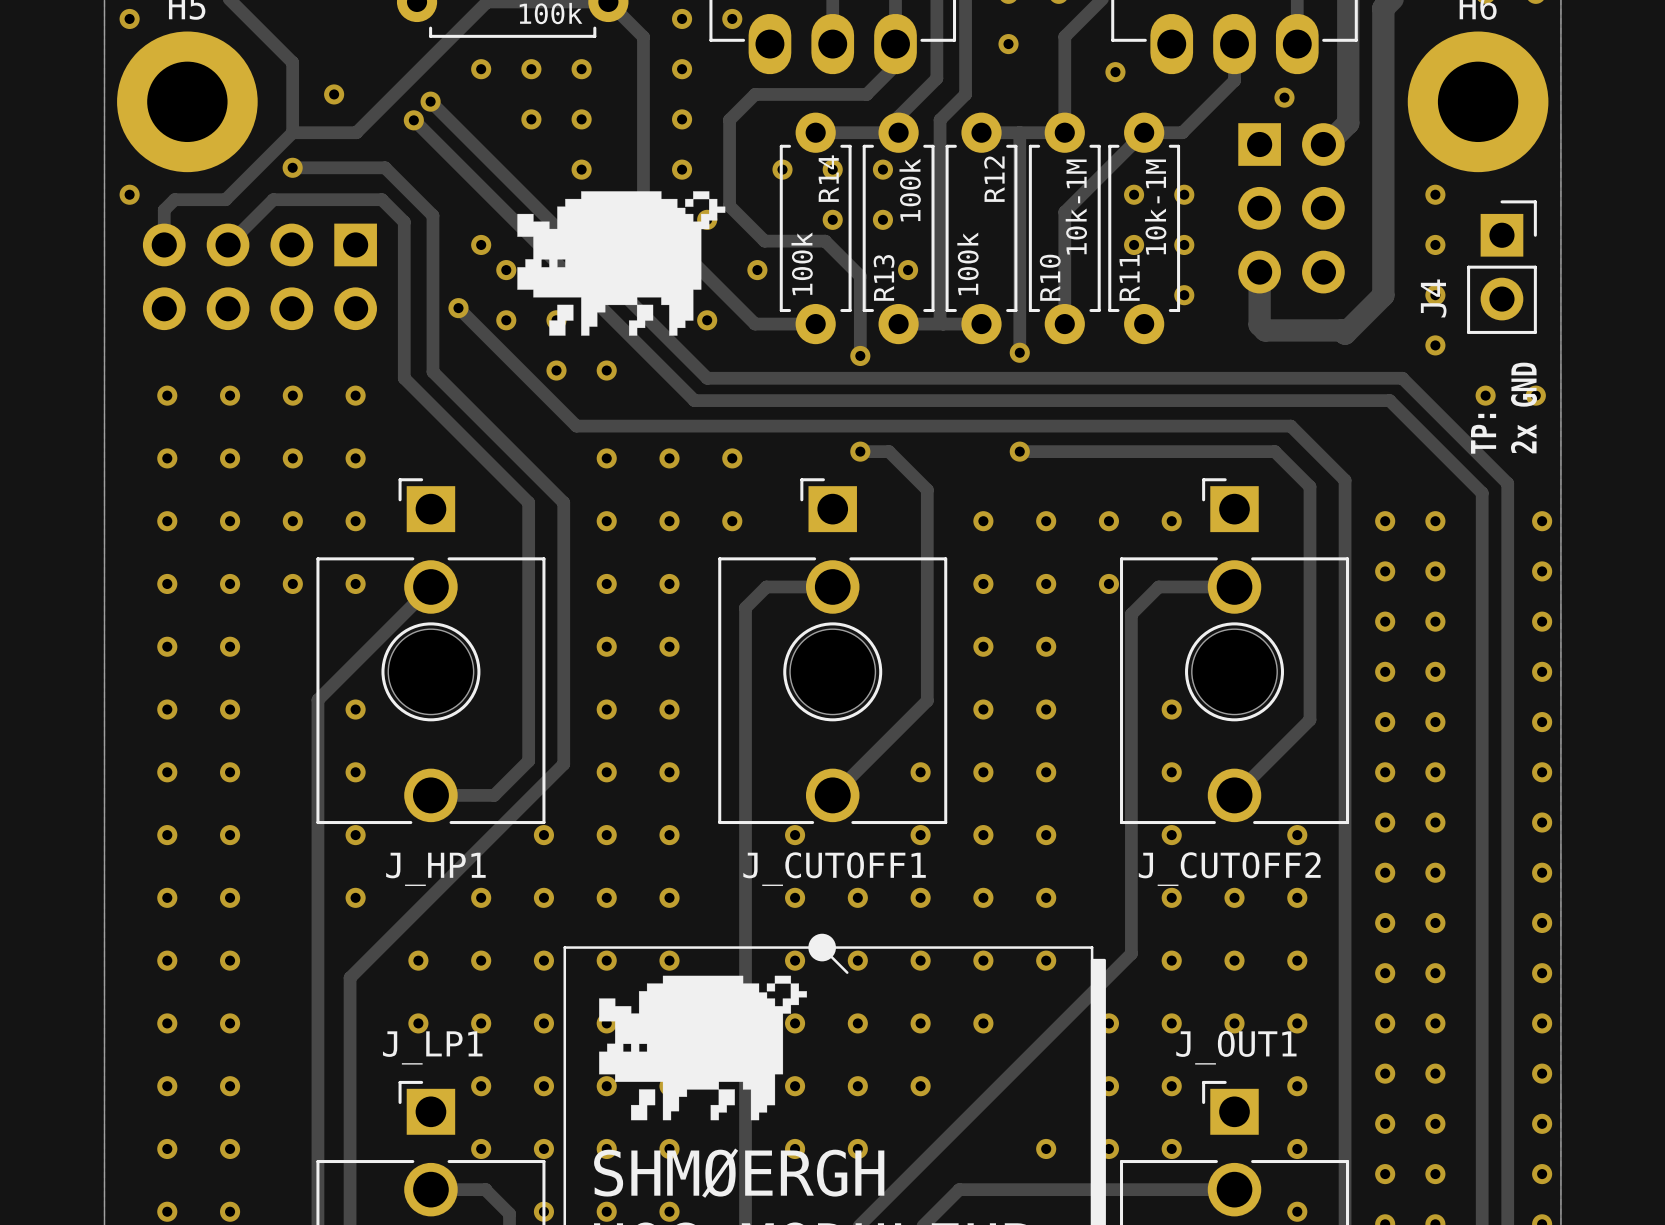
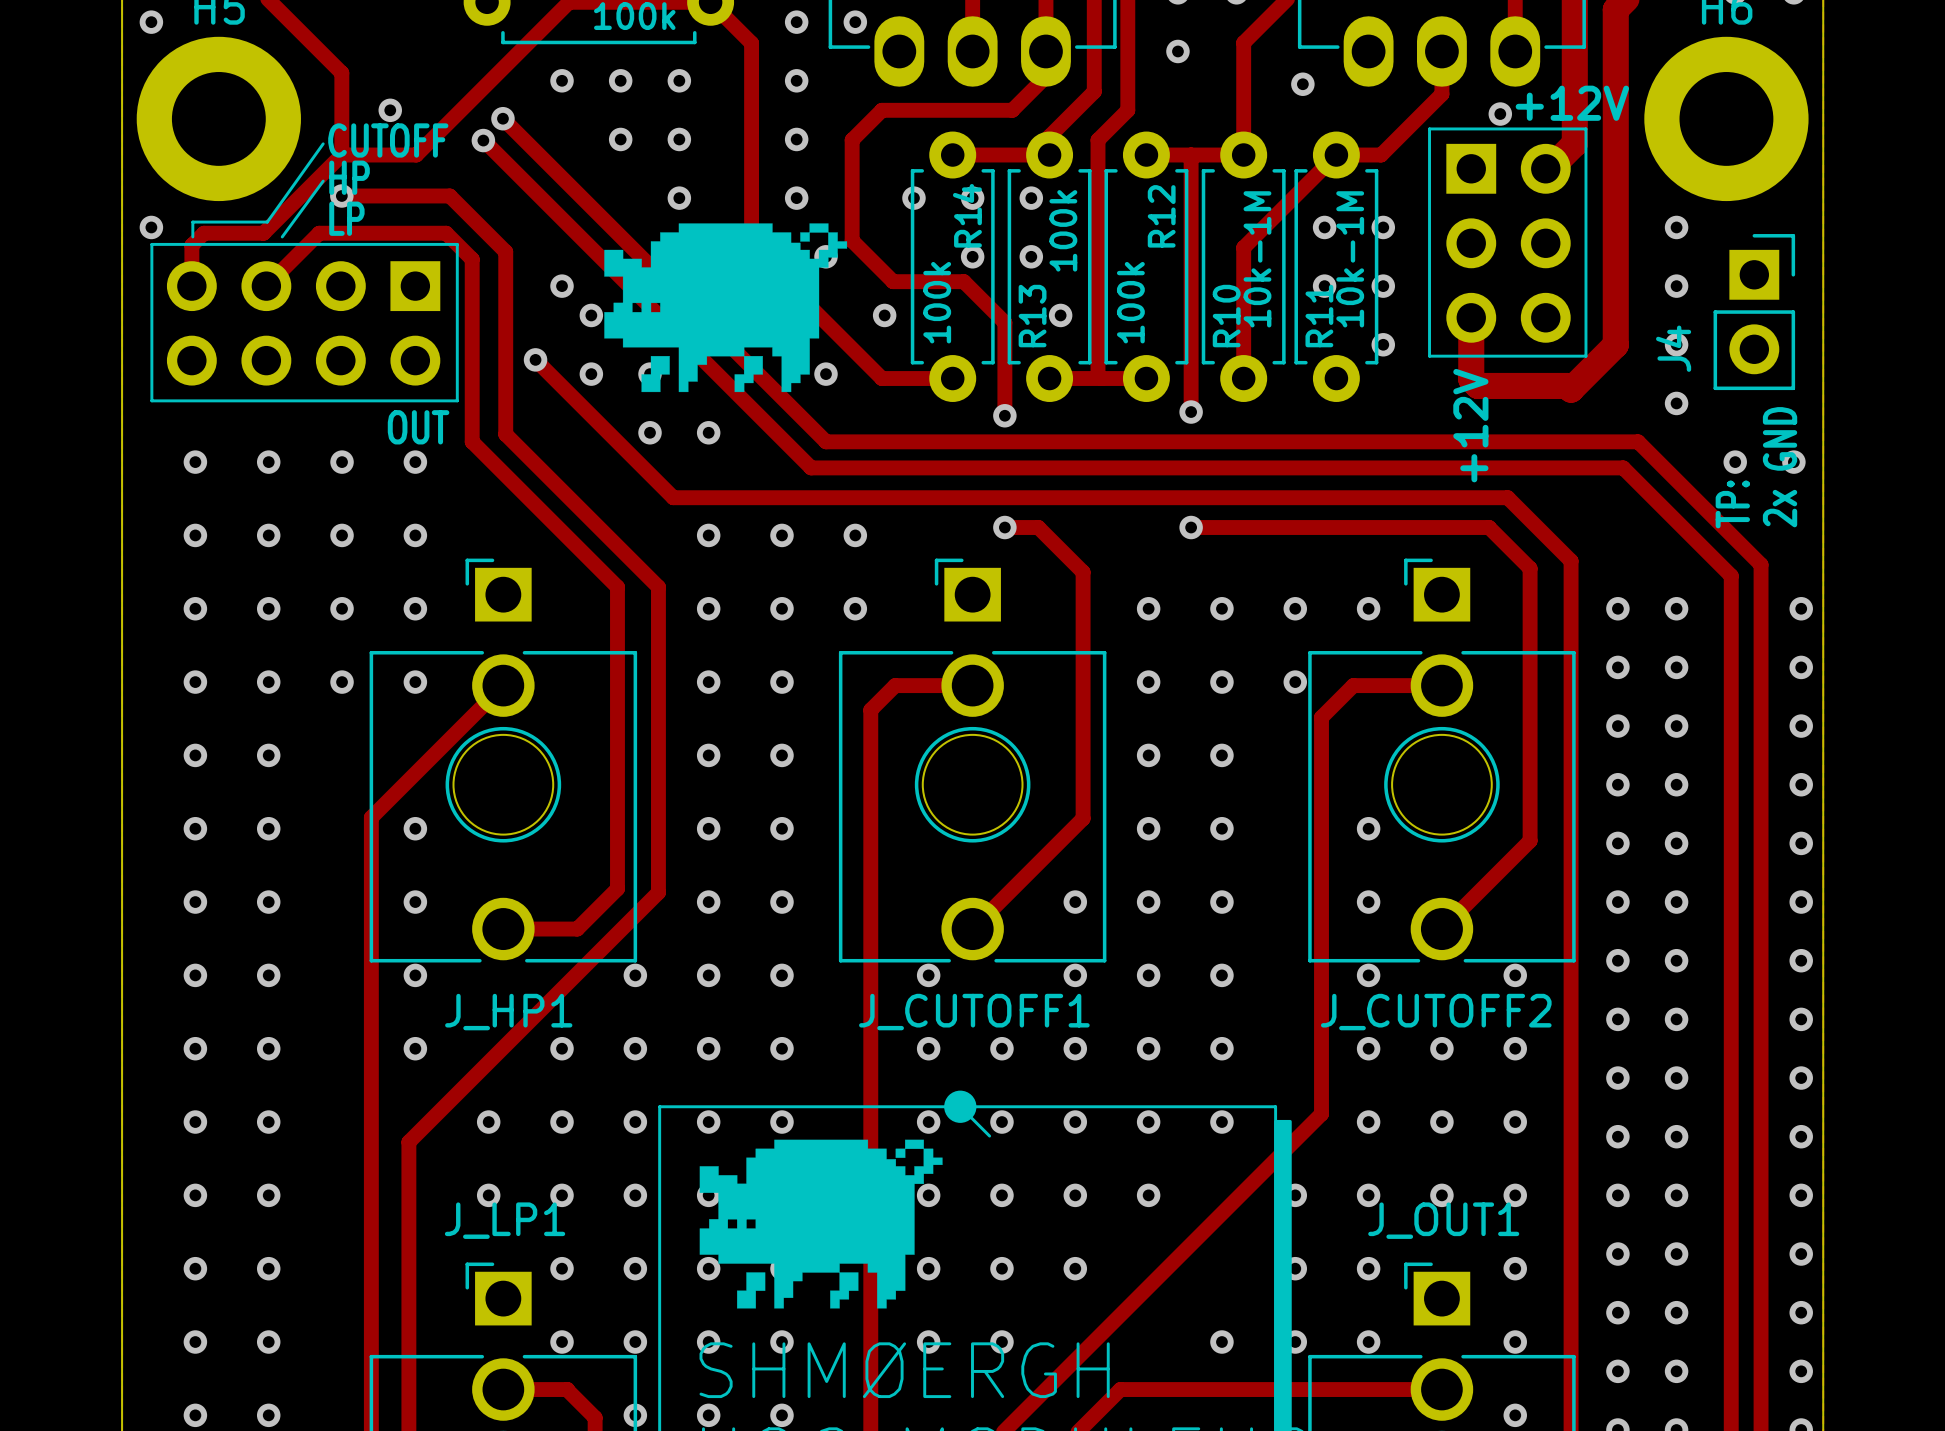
text: none -> +12V (1572, 103)
line: none -> (1429, 128) (1585, 128) (1585, 356) (1429, 356) (1429, 128)
text: none -> CUTOFF (388, 140)
line: none -> (323, 143) (267, 222) (192, 222) (192, 236)
text: none -> HP (349, 177)
line: none -> (323, 181) (282, 236)
text: none -> LP (346, 218)
line: none -> (151, 244) (457, 244) (457, 400) (151, 400) (151, 244)
text: none -> OUT (418, 427)
text: none -> +12V (1470, 425)

